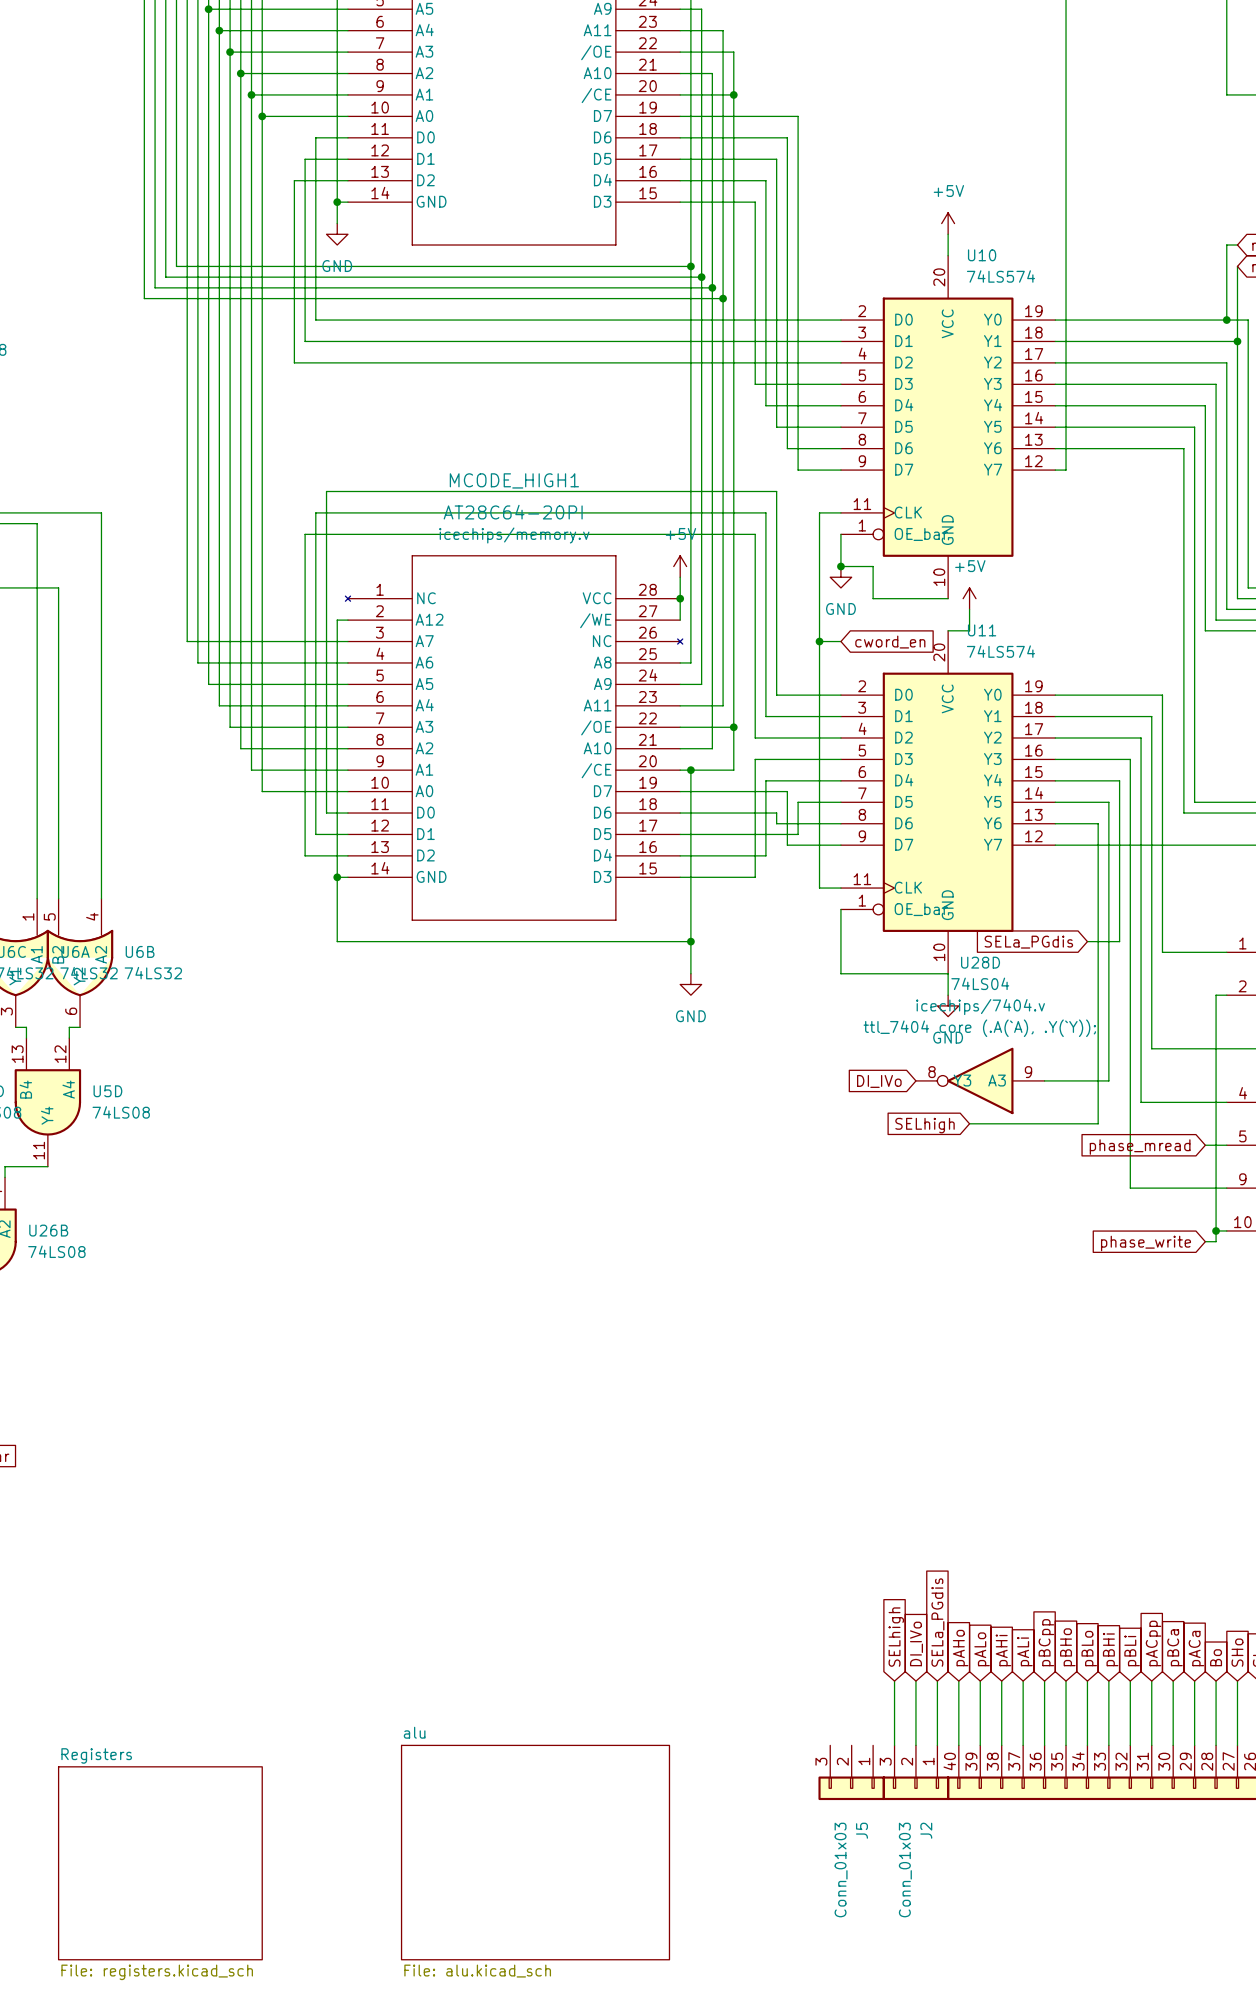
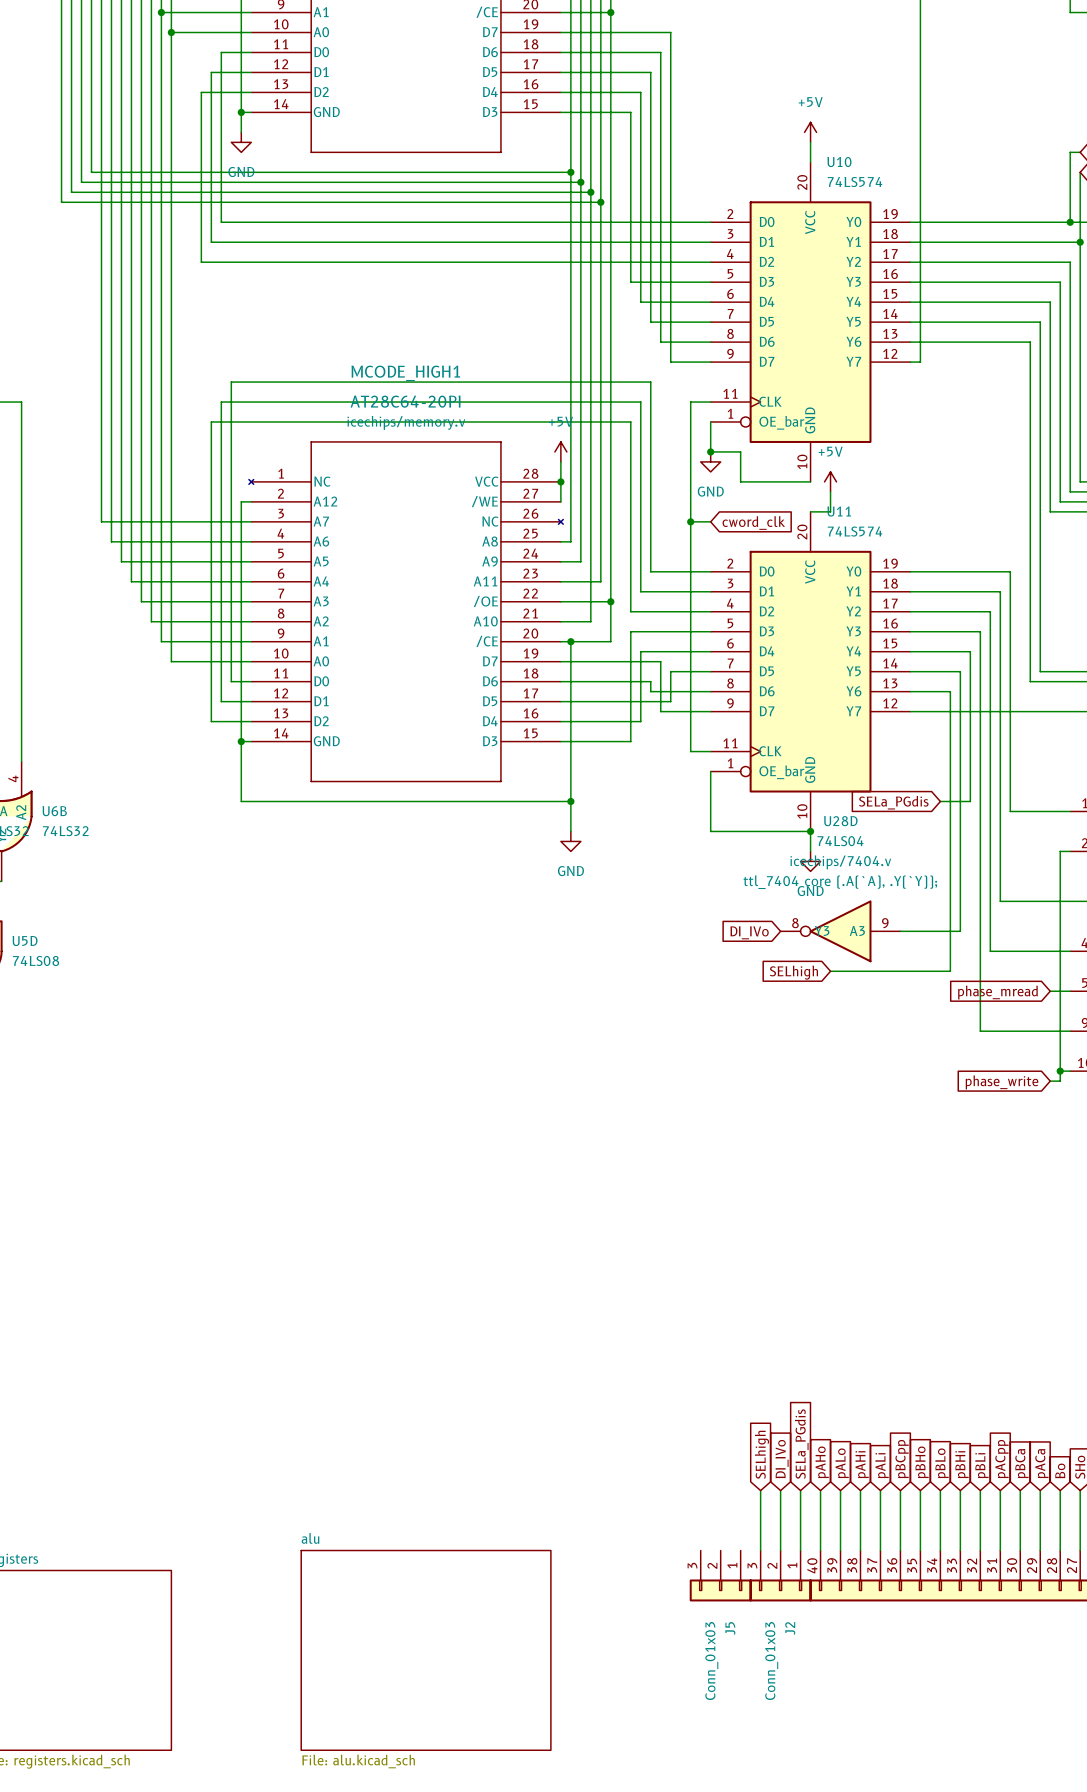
global label: cword_en (890, 642) -> cword_clk (753, 523)
junction: none -> (810, 831)

